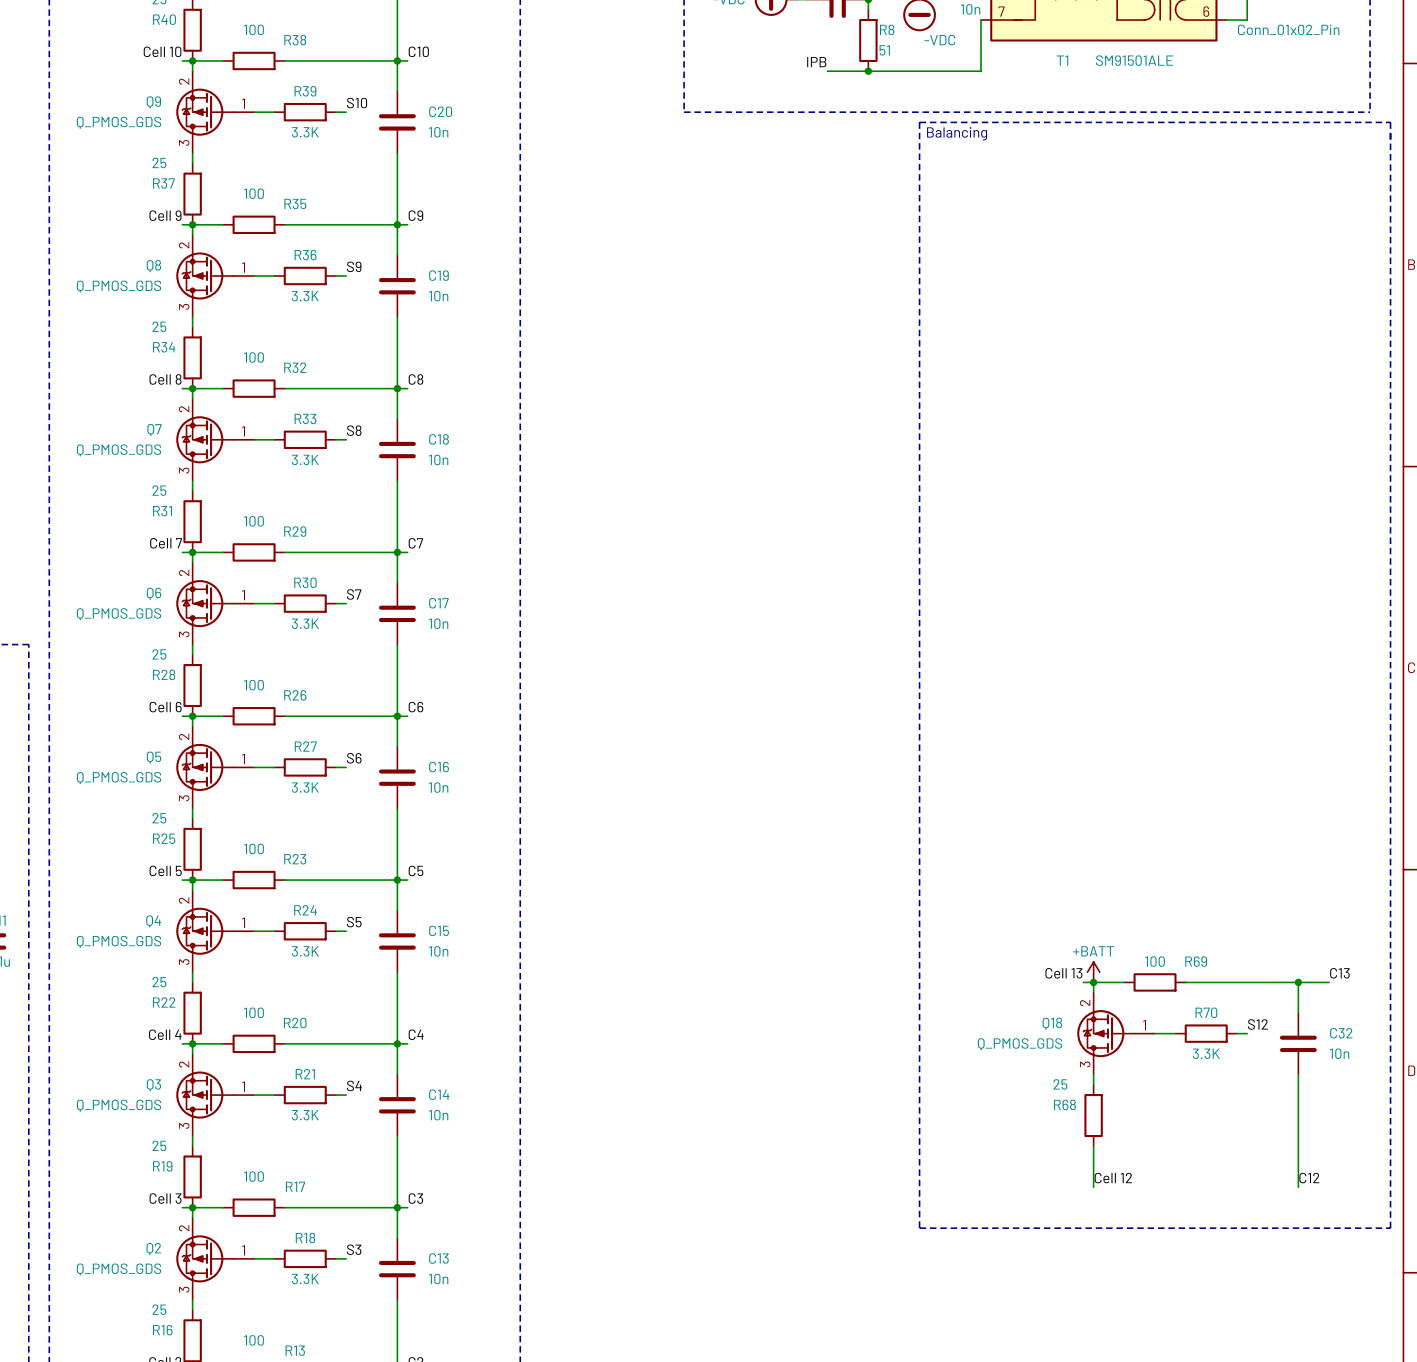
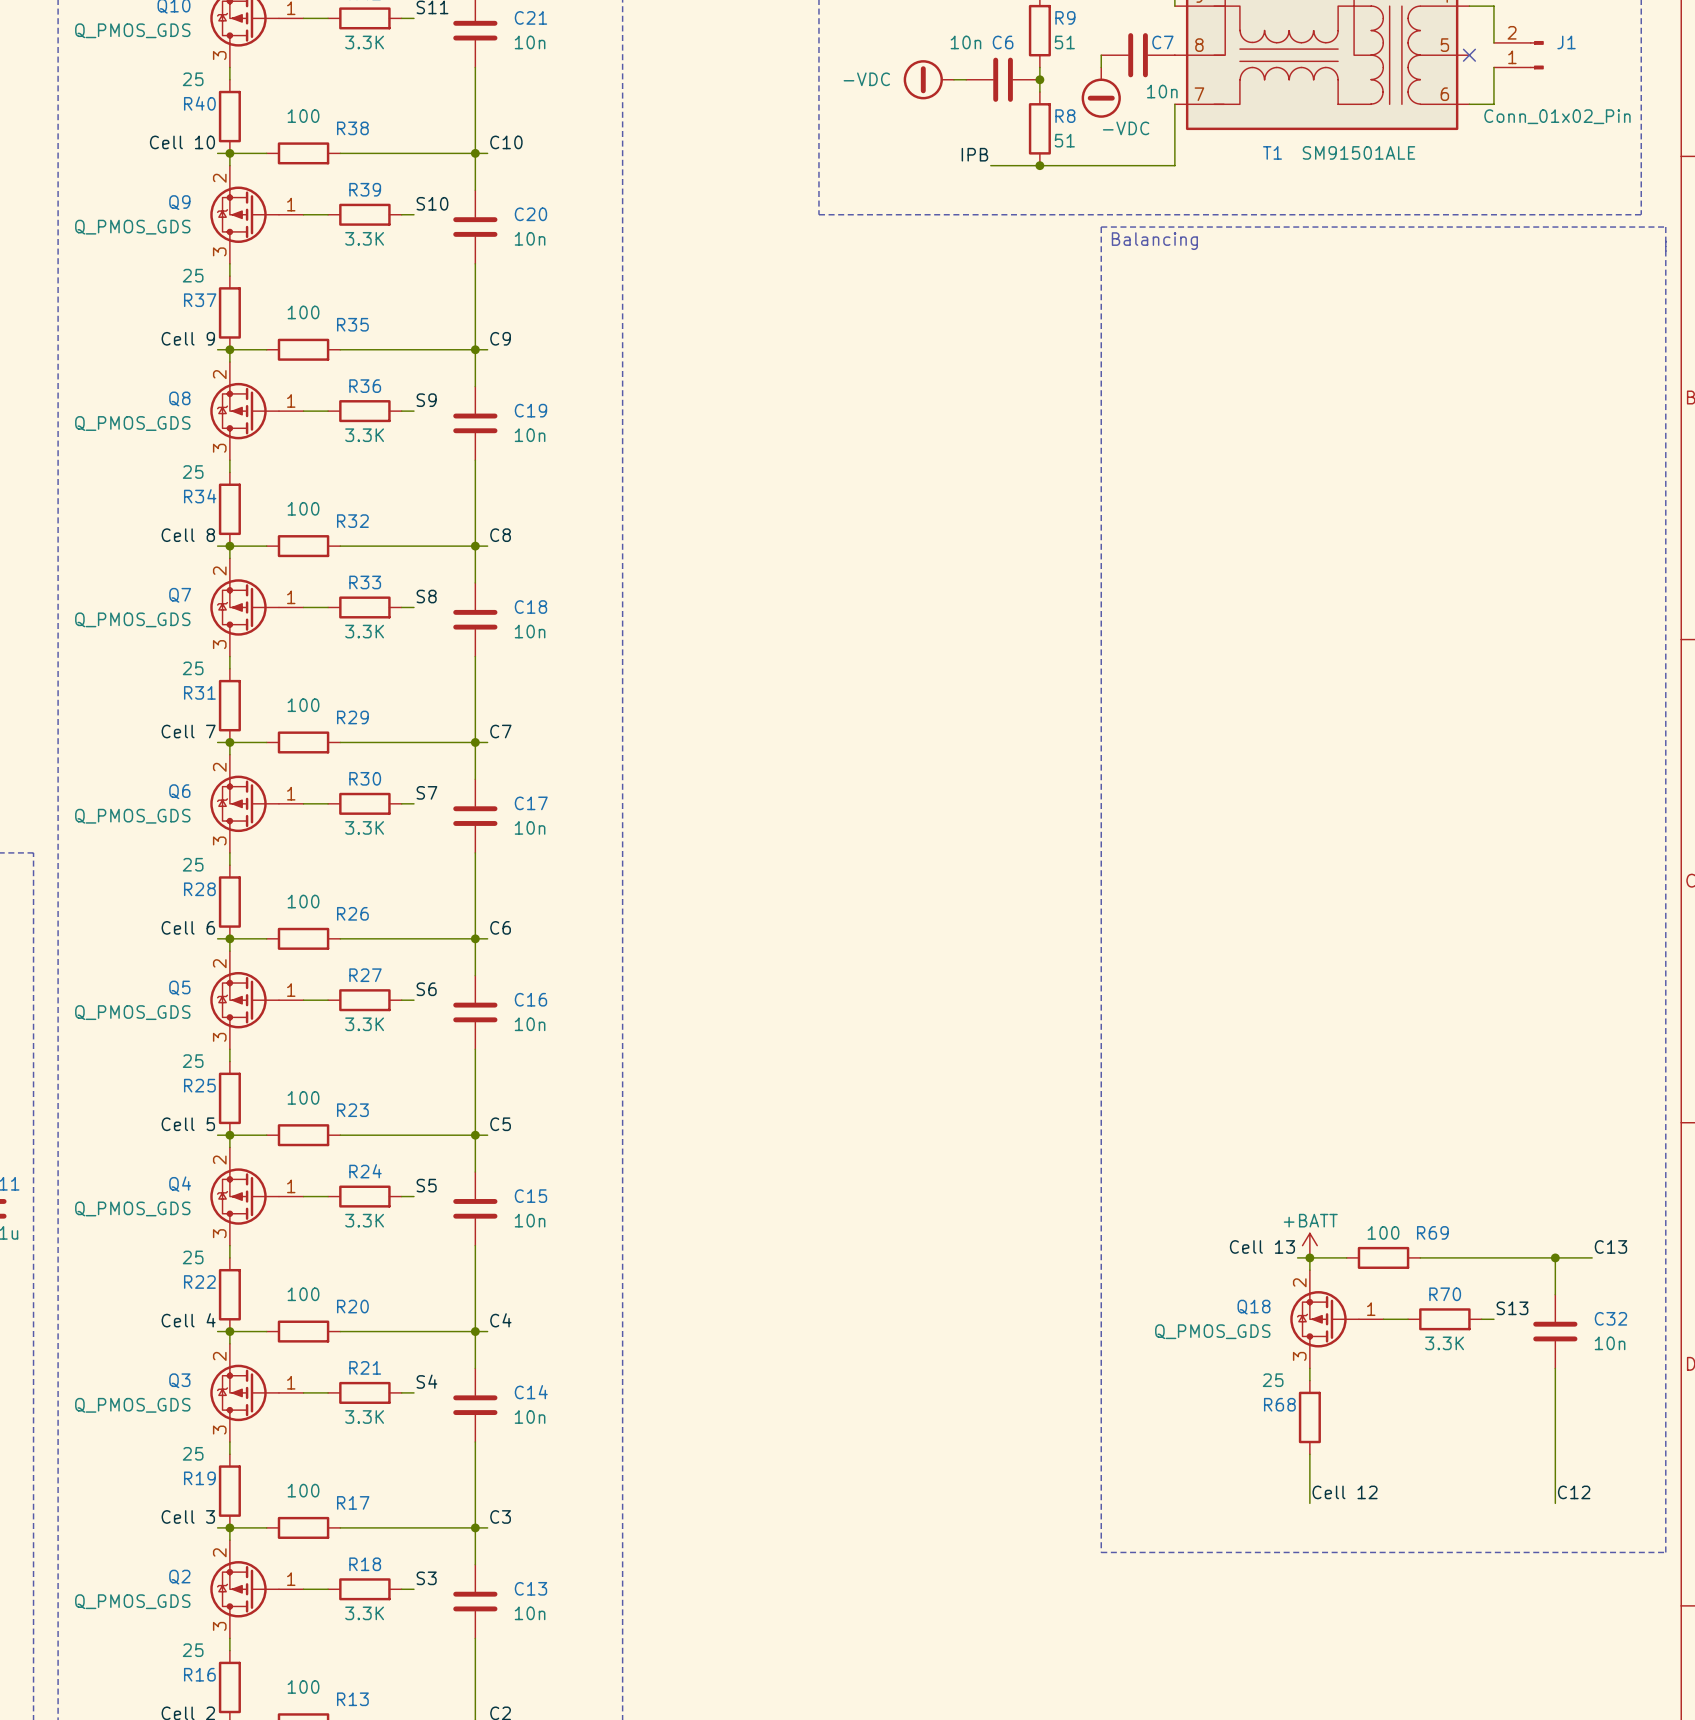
label: S12 (1257, 1024) -> S13 (1512, 1308)

